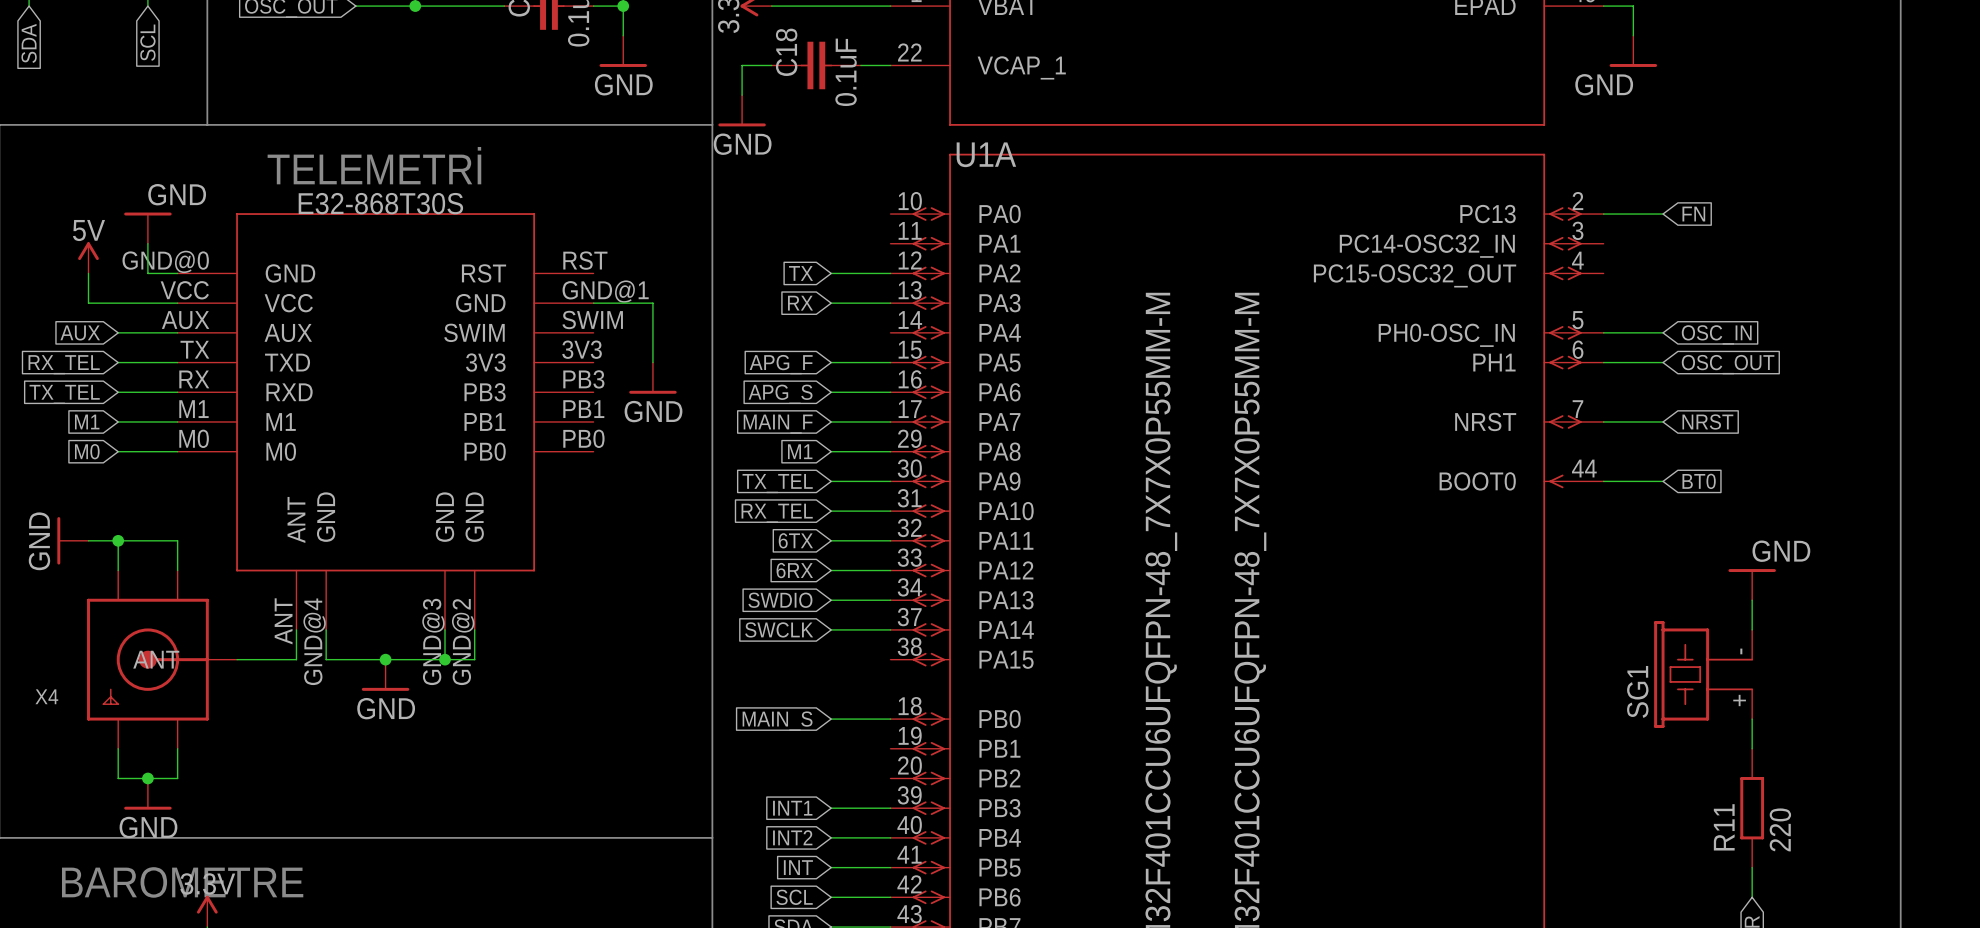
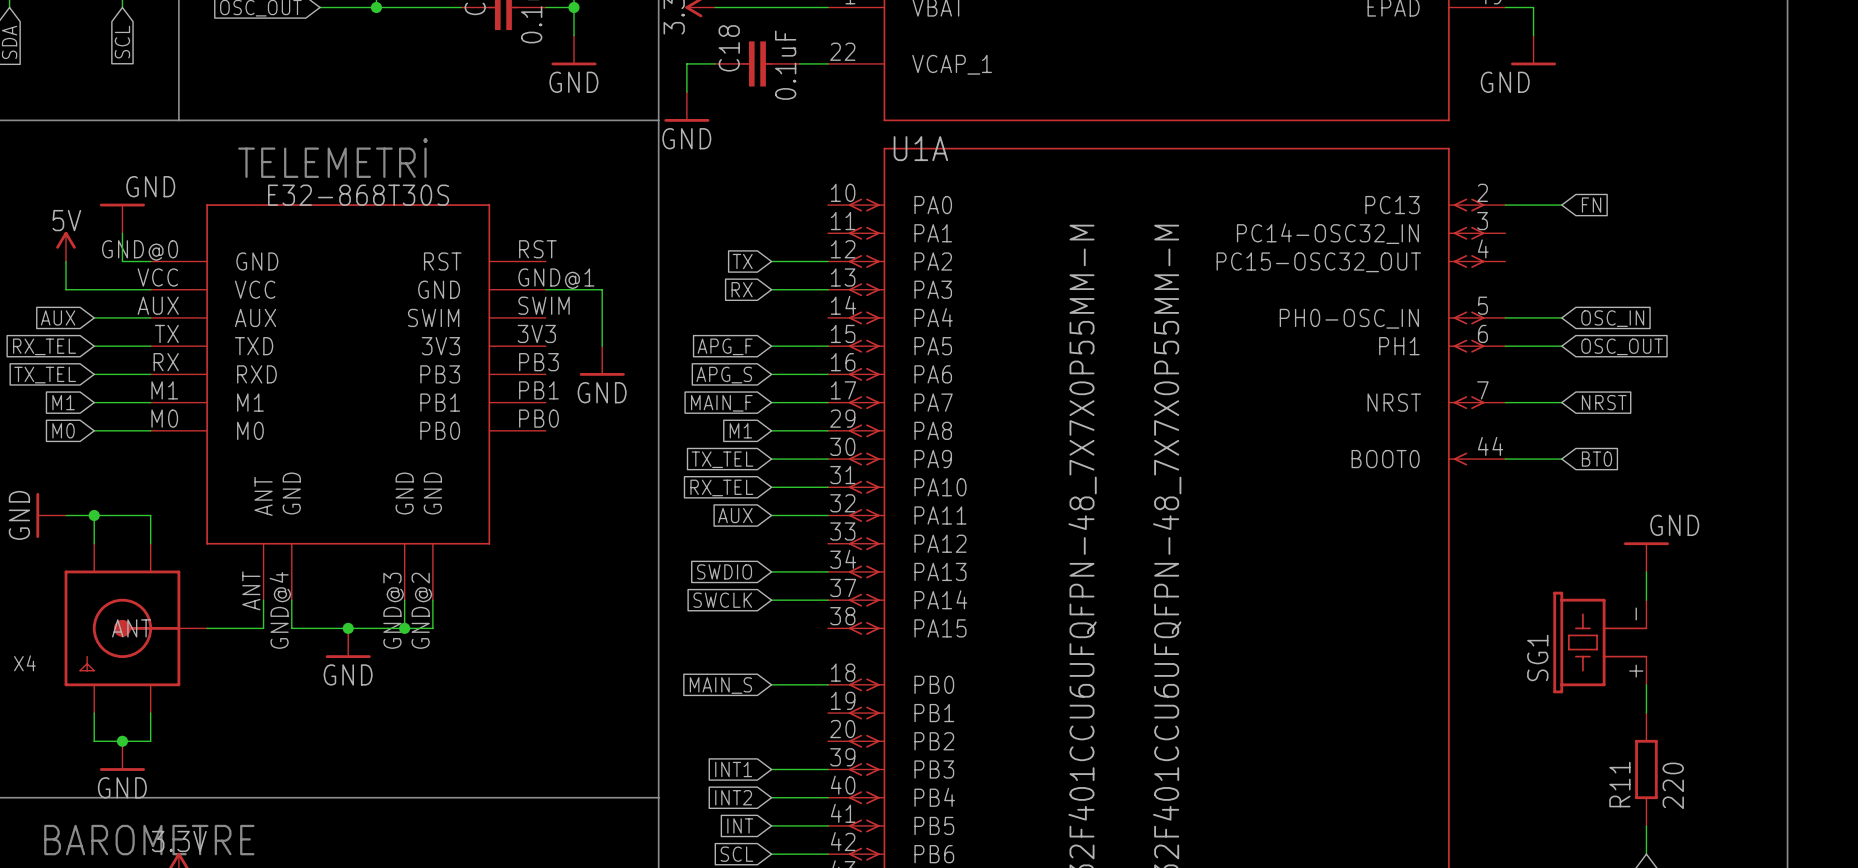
global label: 6TX (795, 540) -> AUX (735, 515)
global label: 6RX (794, 570) -> none
wire: (831, 570) (890, 570) -> none

